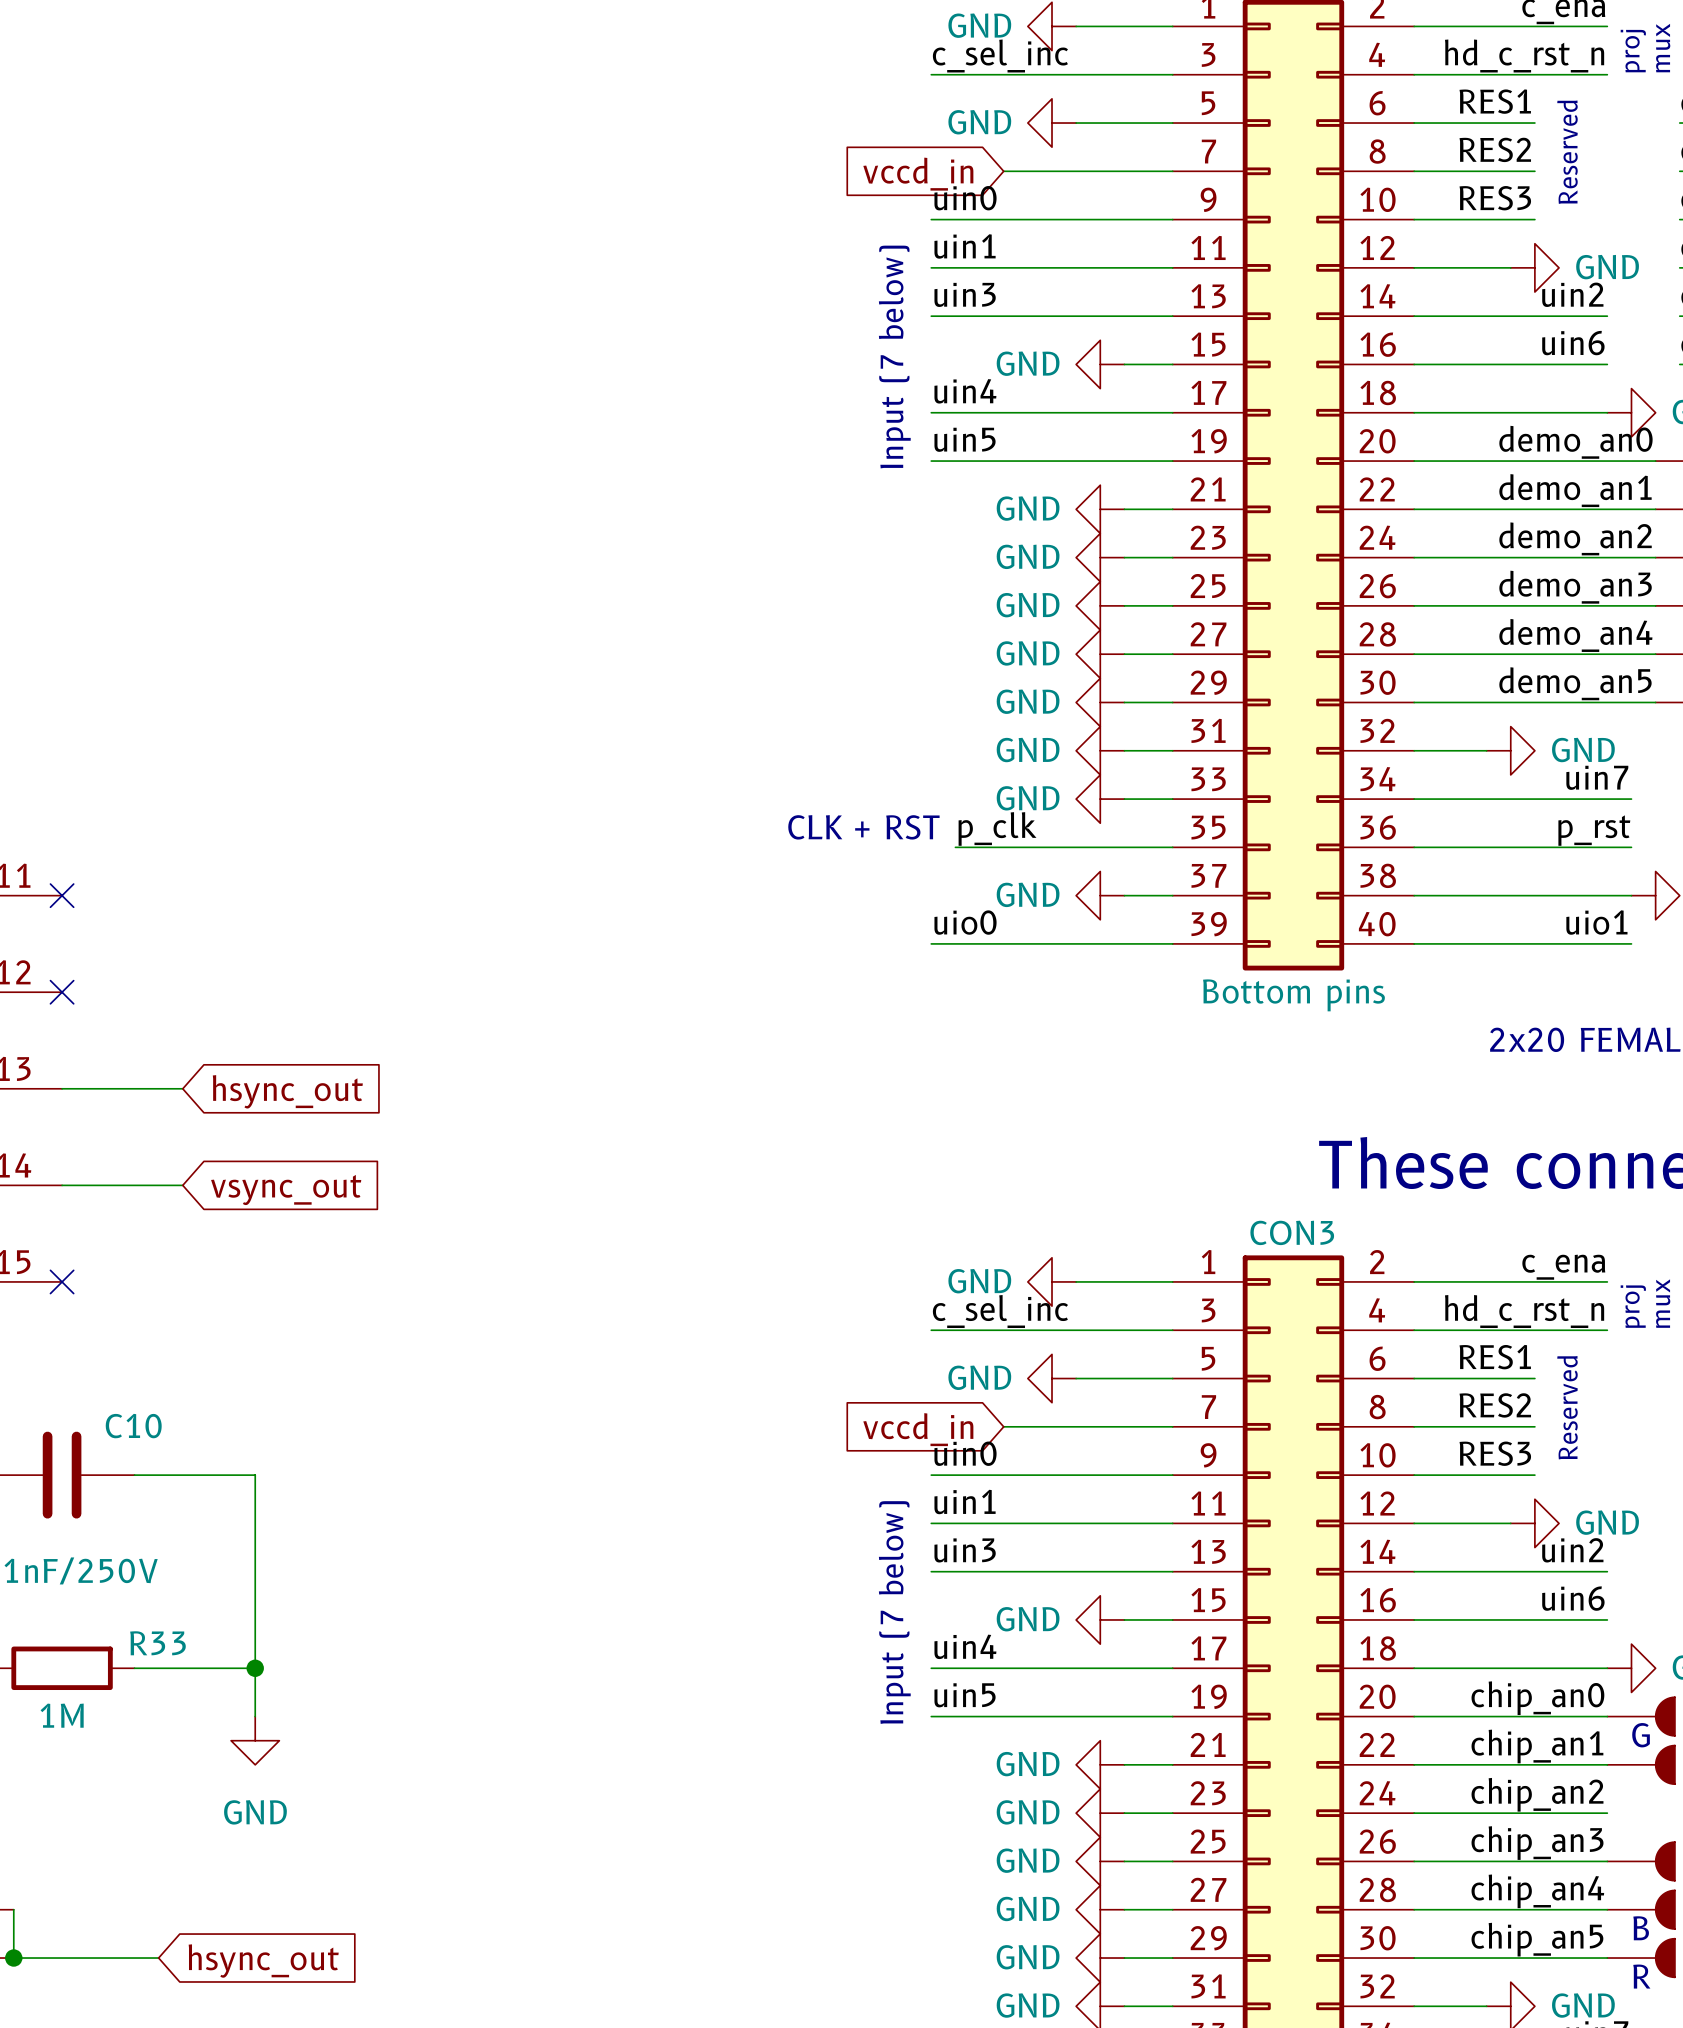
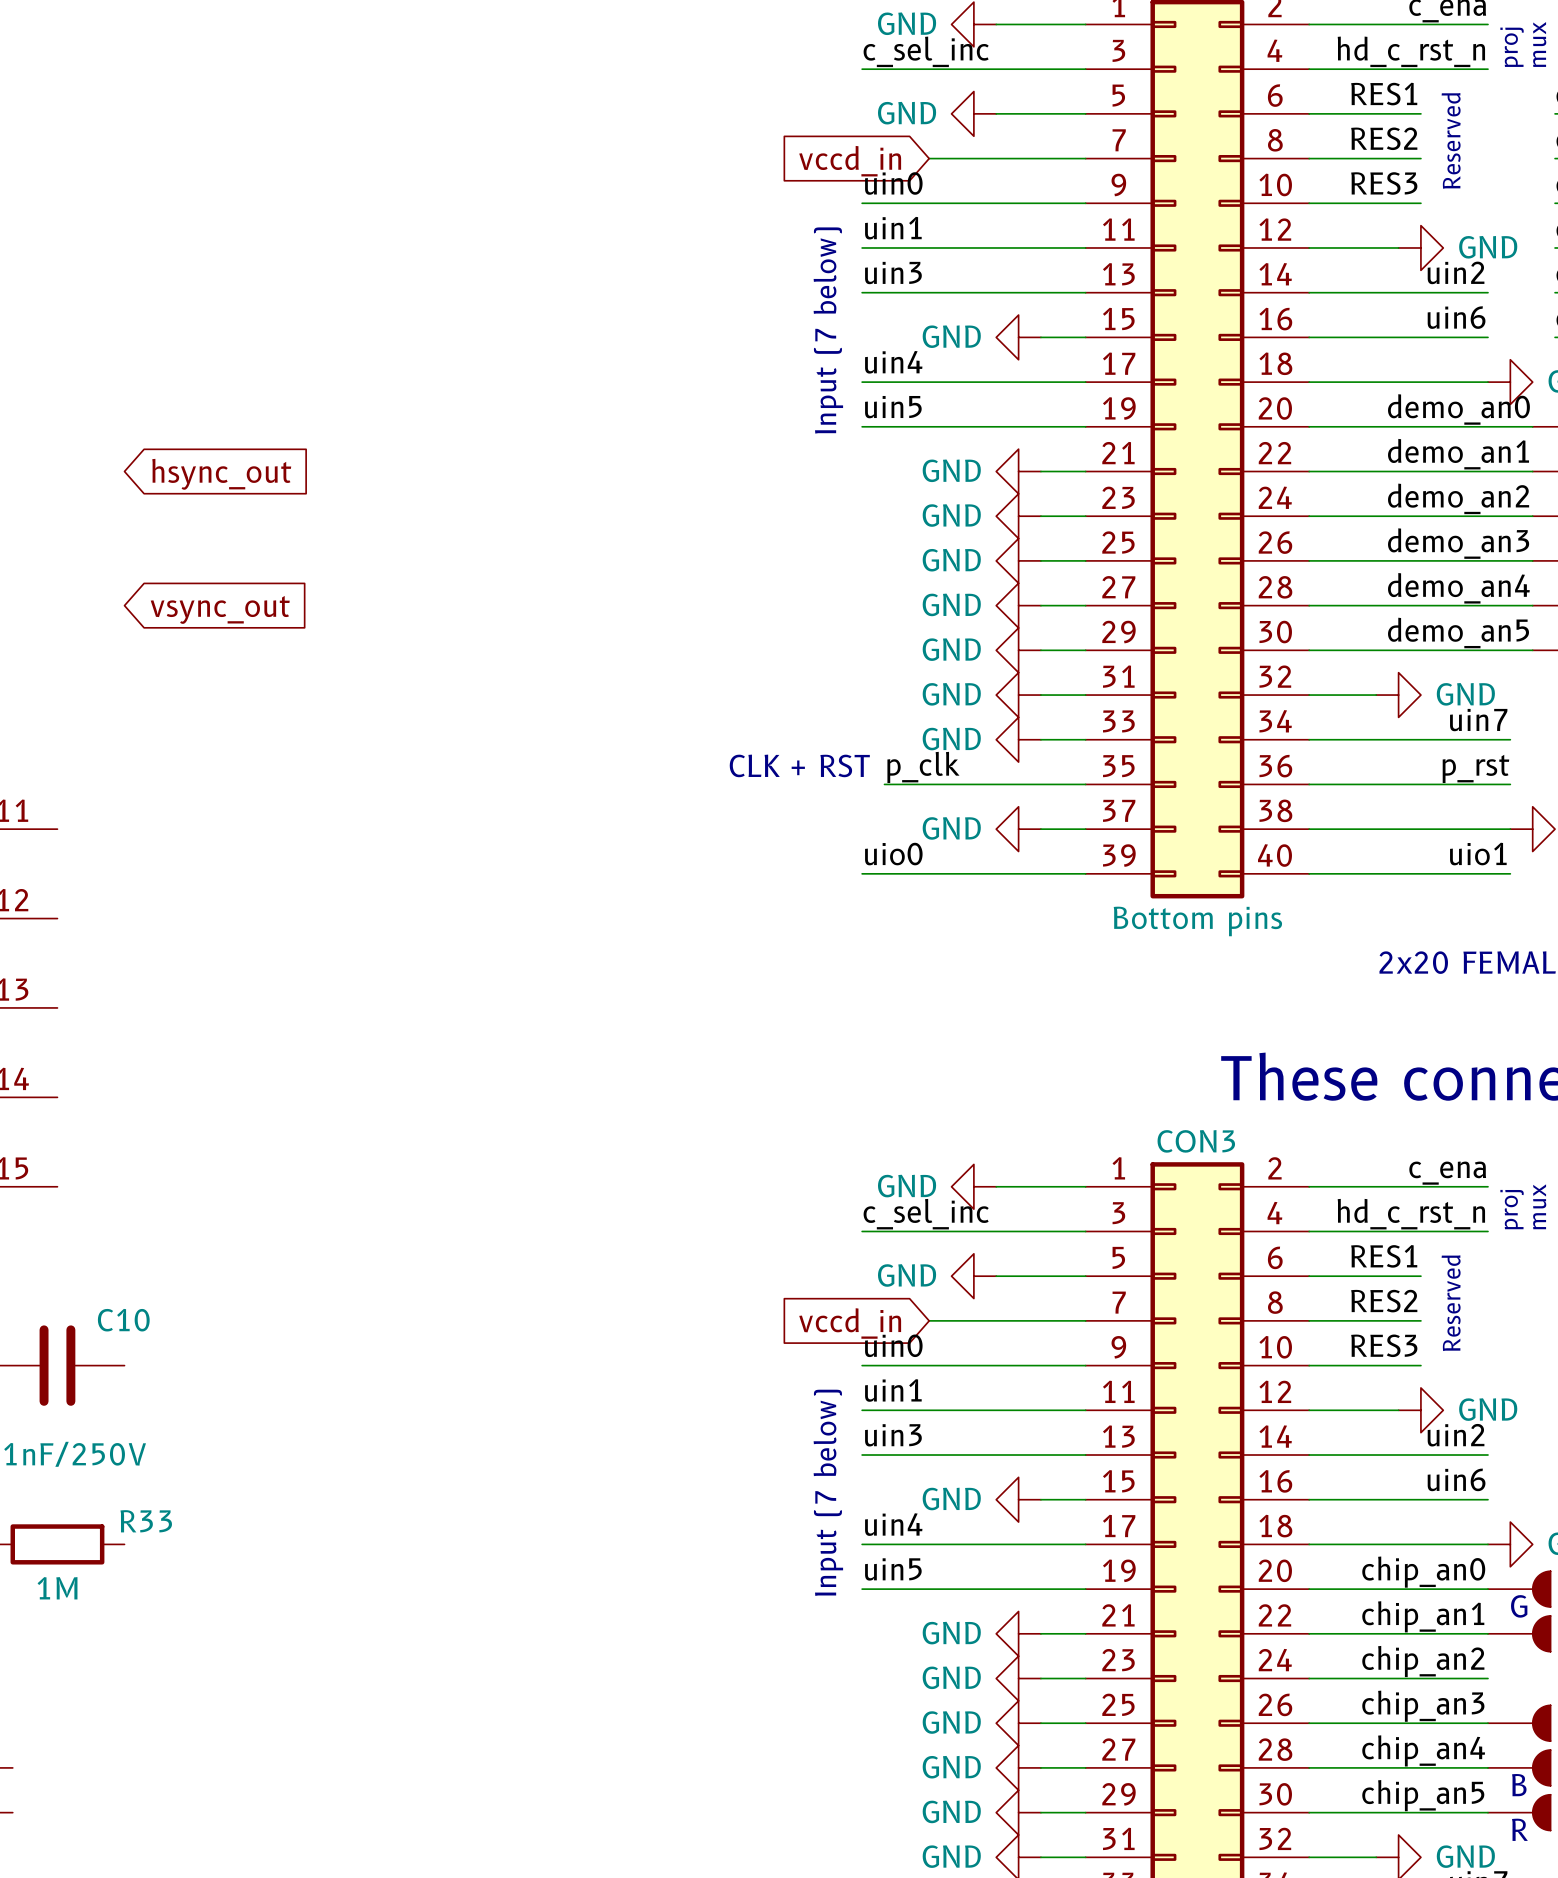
global label: none -> hsync_out (221, 474)
global label: none -> vsync_out (220, 609)
no-connect mark: (62, 895) -> none
no-connect mark: (62, 992) -> none
wire: (62, 1088) (182, 1088) -> none
global label: hsync_out (287, 1091) -> none
wire: (62, 1185) (182, 1185) -> none
global label: vsync_out (286, 1189) -> none
no-connect mark: (62, 1281) -> none
wire: (134, 1475) (255, 1475) (255, 1716) -> none
wire: (134, 1668) (255, 1668) -> none
junction: (255, 1668) -> none
power symbol: GND (255, 1740) -> none
wire: (13, 1909) (13, 1958) (158, 1958) -> none
junction: (13, 1958) -> none
global label: hsync_out (263, 1961) -> none

